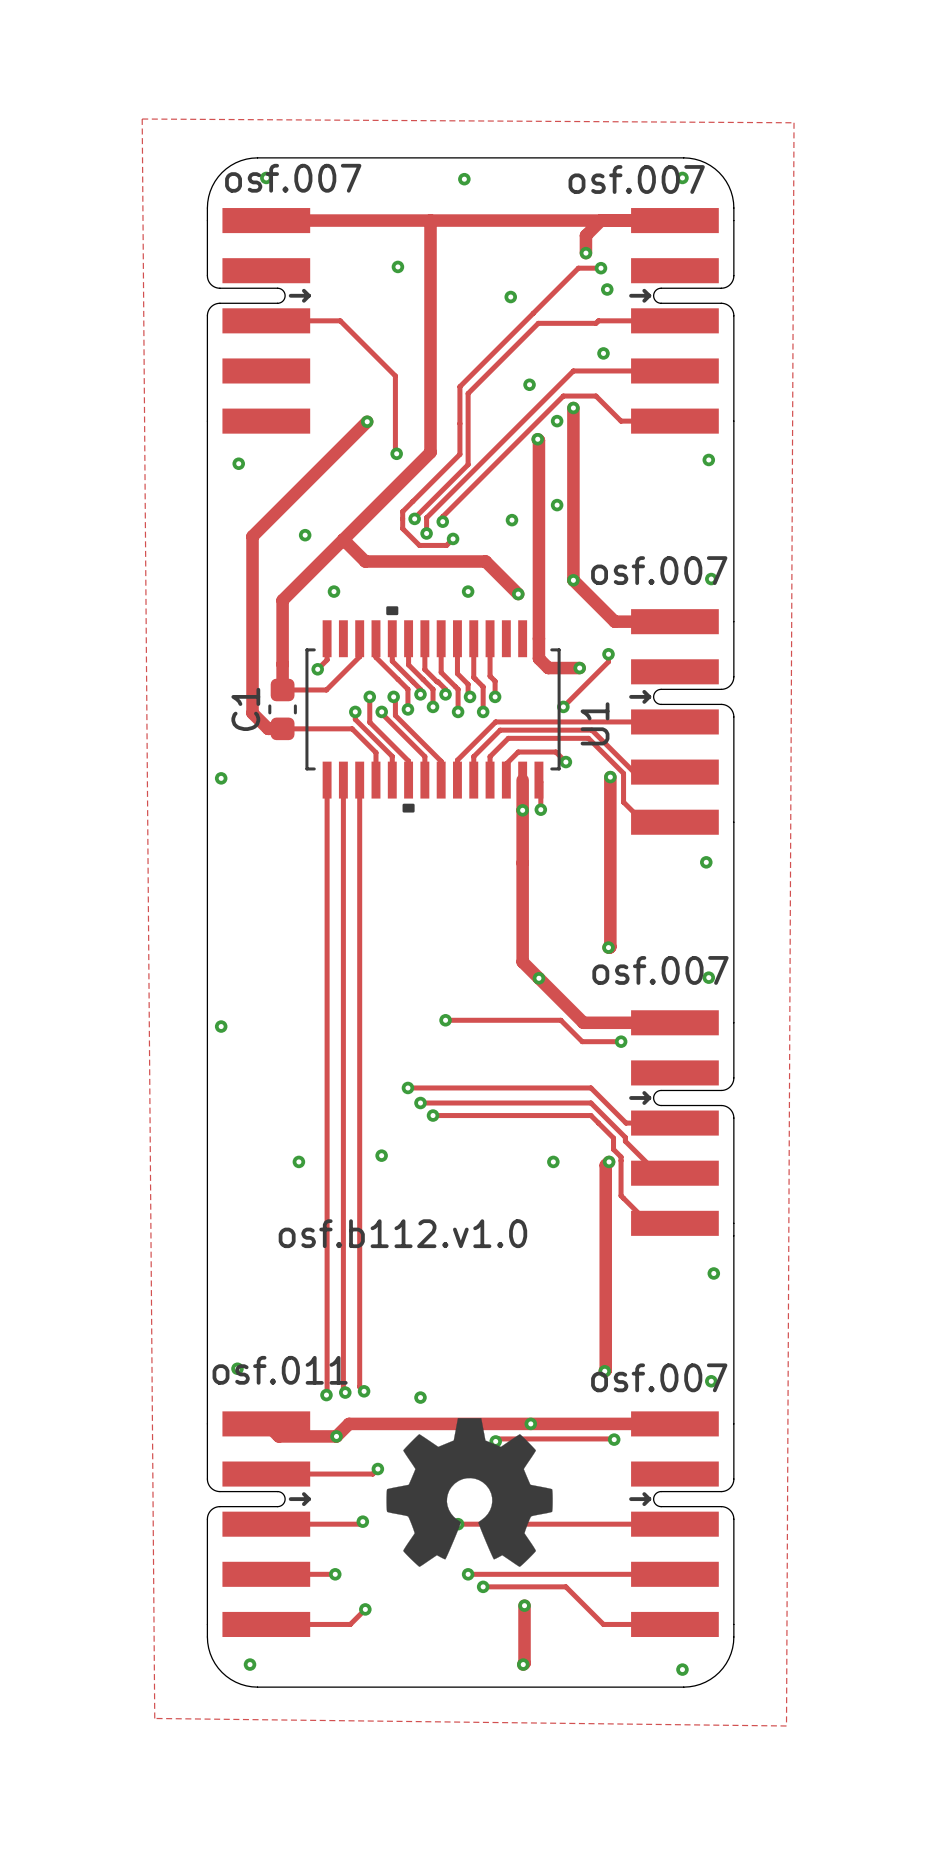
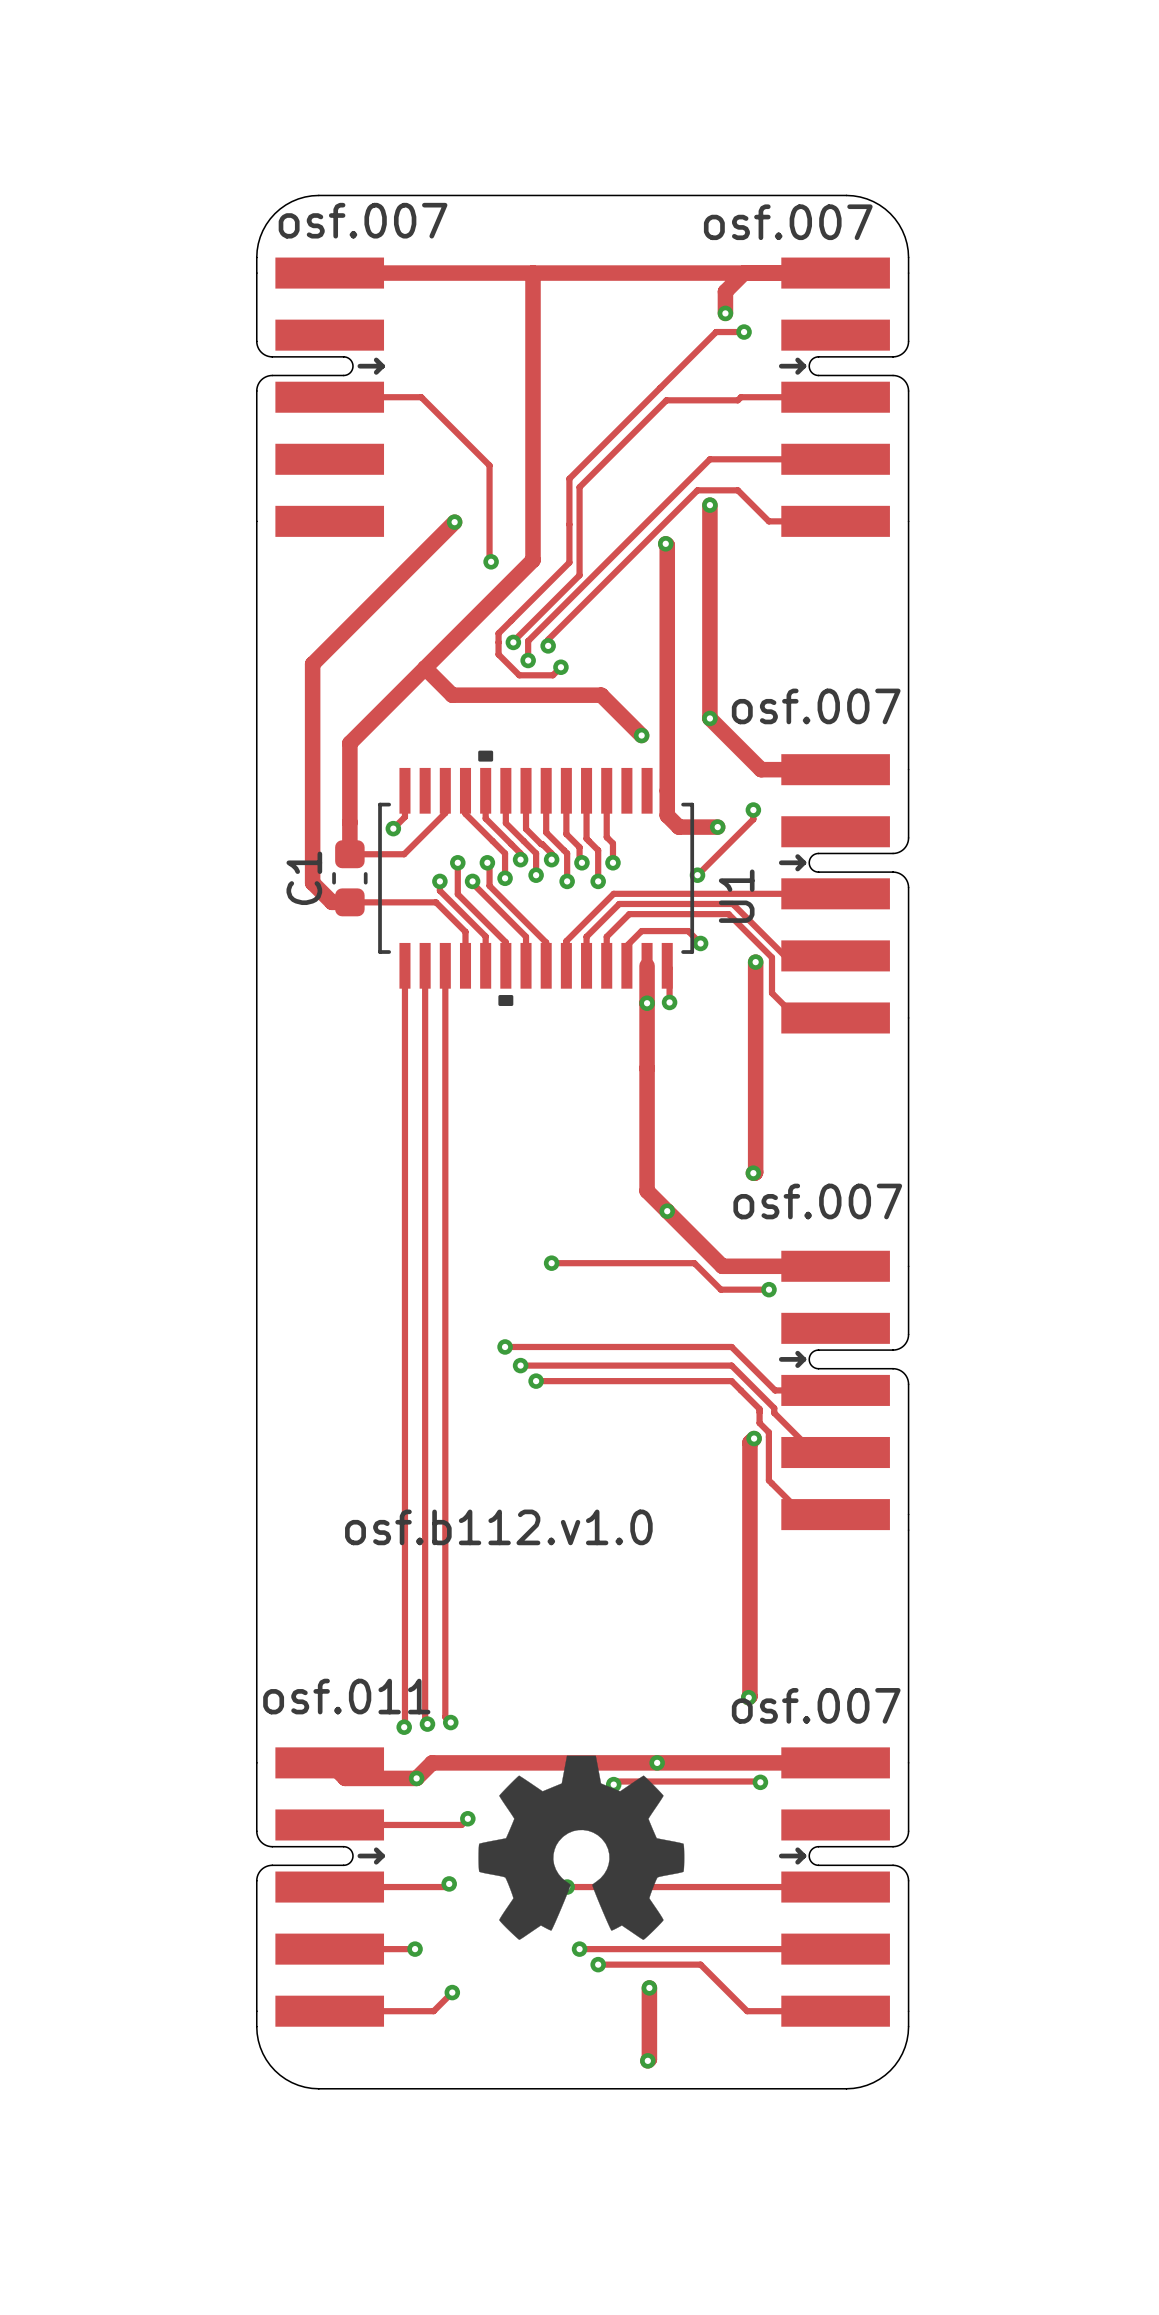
zone outline: (142, 119) (154, 1718) (786, 1725) (794, 122) (142, 119) -> none
via: (266, 177) -> none
via: (682, 177) -> none
via: (464, 179) -> none
via: (397, 266) -> none
via: (607, 289) -> none
via: (510, 297) -> none
via: (603, 353) -> none
via: (529, 384) -> none
via: (557, 421) -> none
via: (708, 459) -> none
via: (238, 463) -> none
via: (557, 505) -> none
via: (511, 520) -> none
via: (305, 535) -> none
via: (711, 579) -> none
via: (333, 591) -> none
via: (468, 591) -> none
via: (221, 778) -> none
via: (706, 862) -> none
via: (708, 977) -> none
via: (221, 1026) -> none
via: (381, 1155) -> none
via: (298, 1161) -> none
via: (553, 1161) -> none
via: (713, 1273) -> none
via: (237, 1368) -> none
via: (711, 1381) -> none
via: (420, 1397) -> none
via: (250, 1664) -> none
via: (682, 1669) -> none

